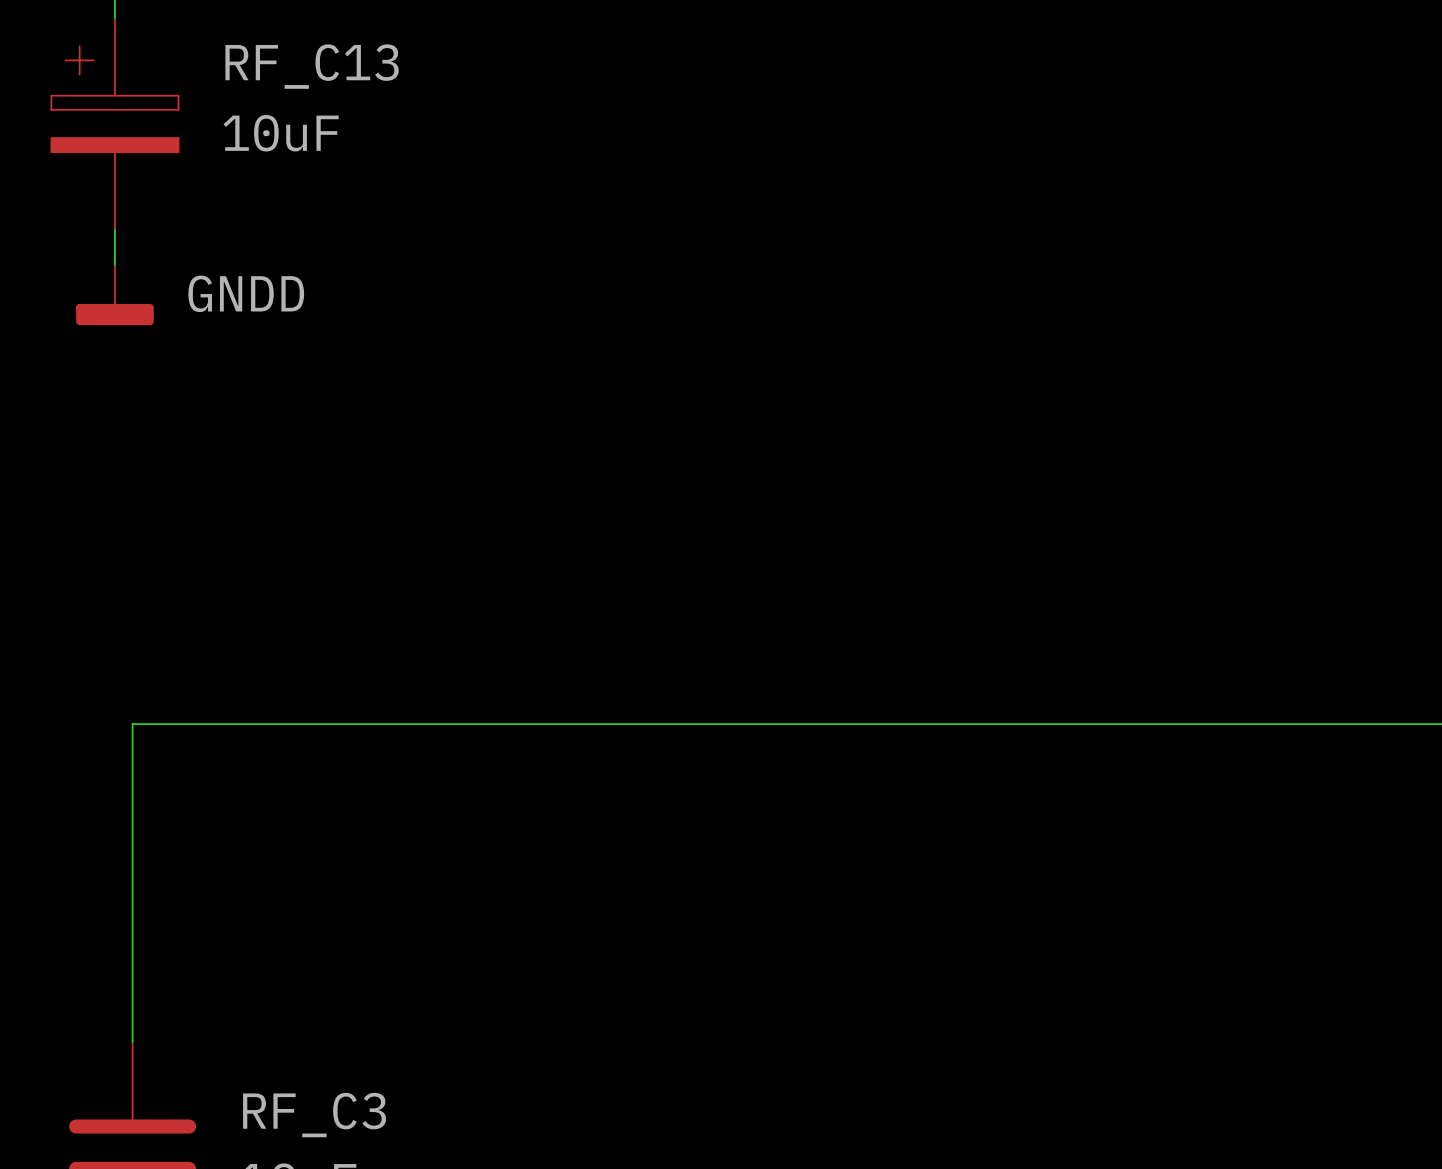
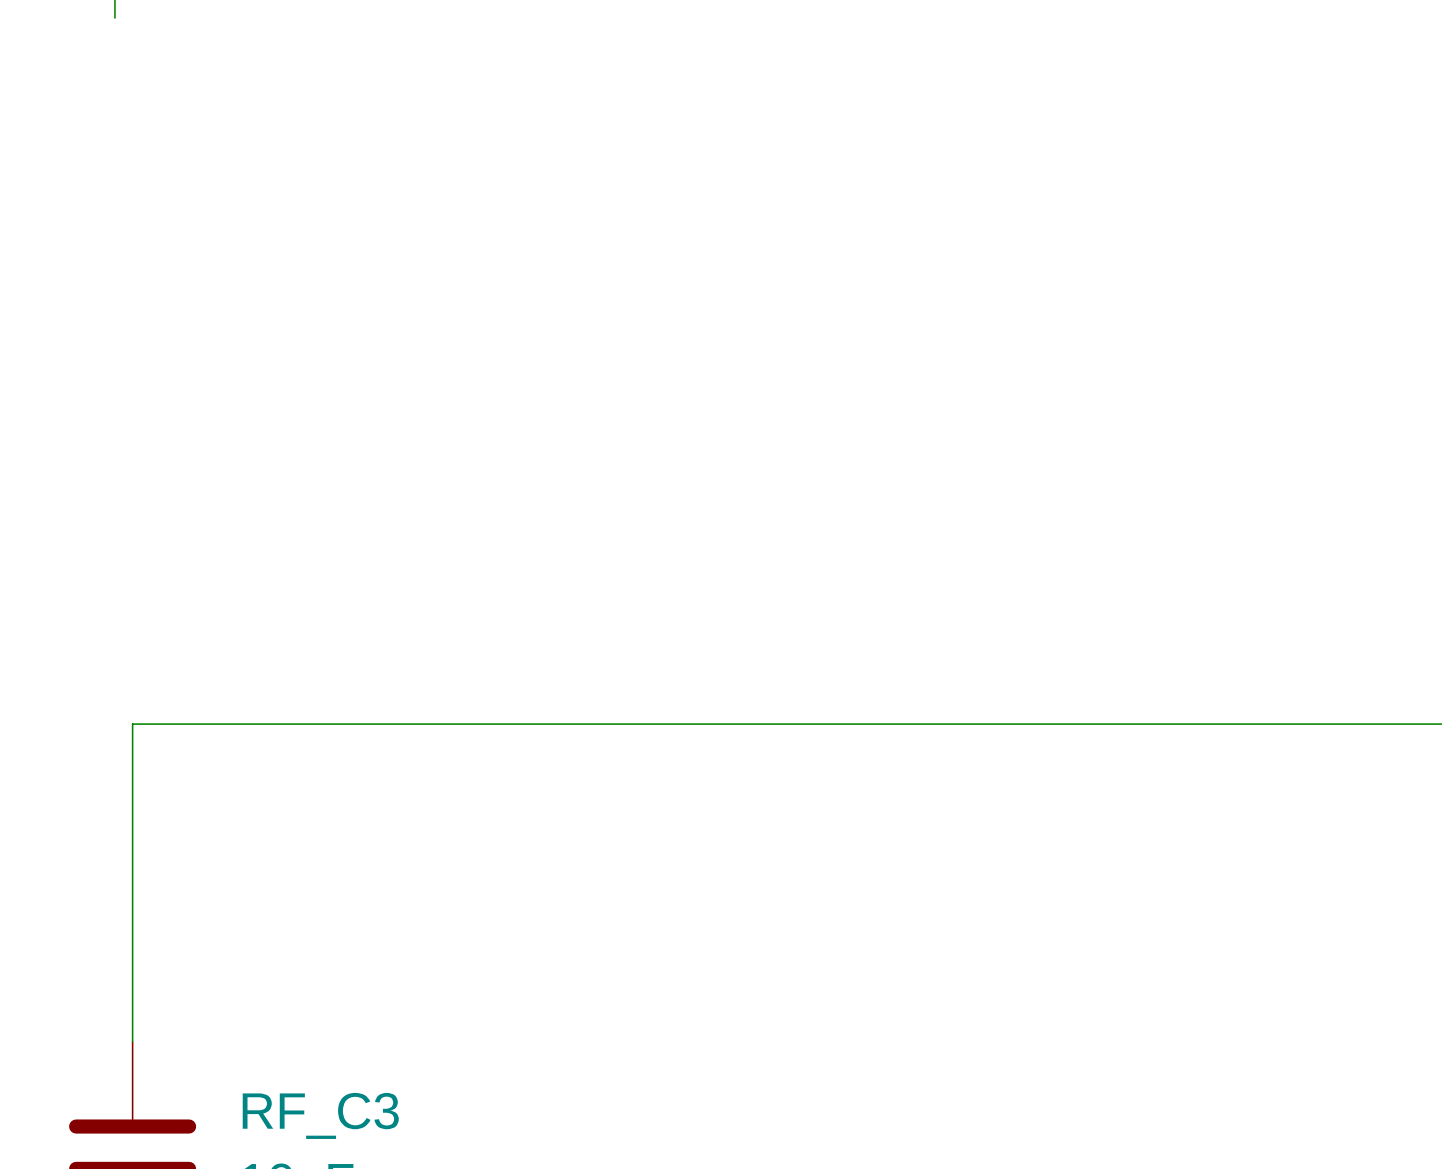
RF_C13: 10uF (114, 123) -> none
wire: (114, 229) (114, 265) -> none
power symbol: GNDD (114, 295) -> none

